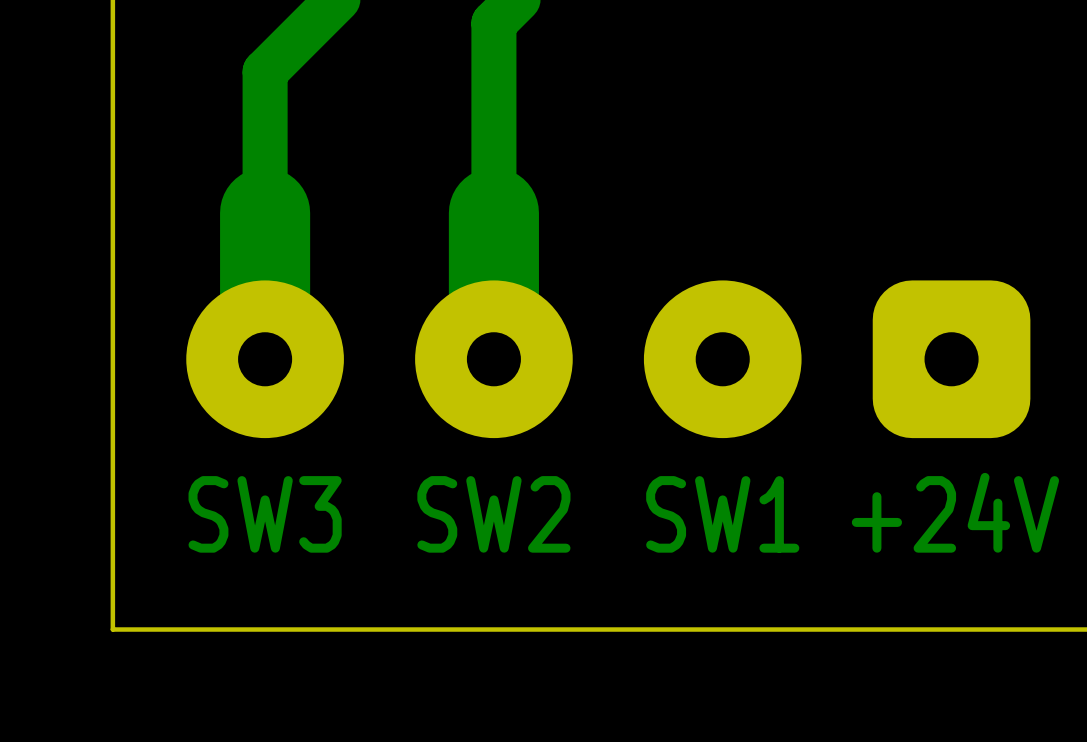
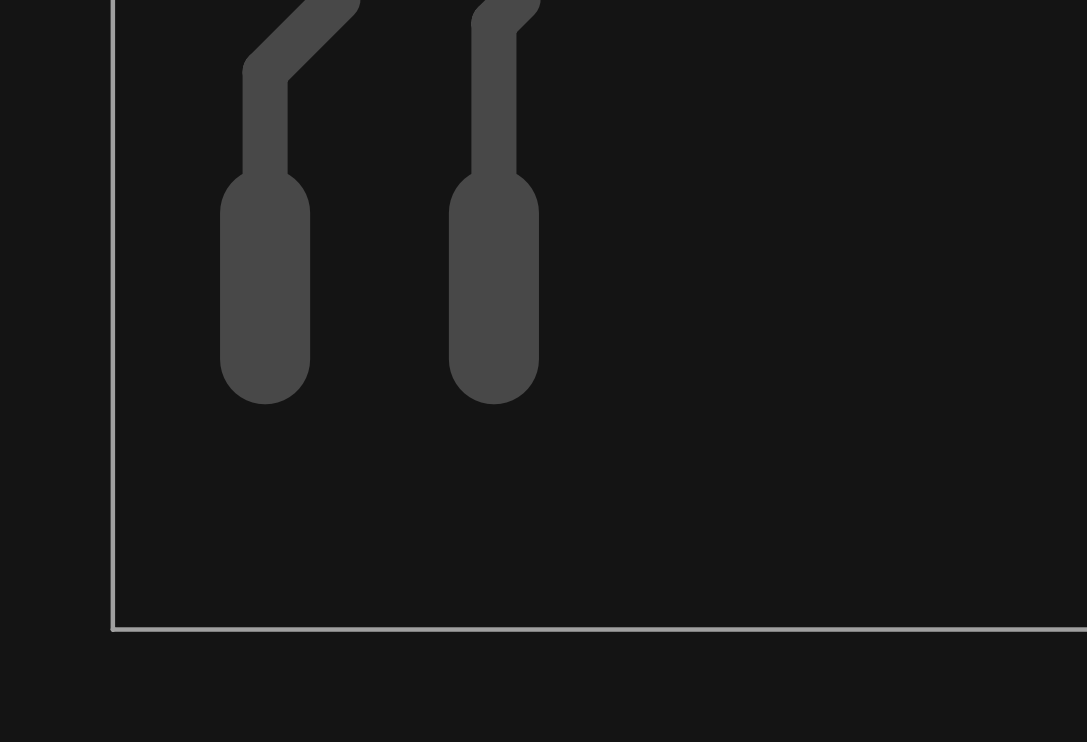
part: (608, 359) -> none
text: +24V (955, 512) -> none
text: SW3 (265, 514) -> none
text: SW2 (493, 514) -> none
text: SW1 (722, 514) -> none

